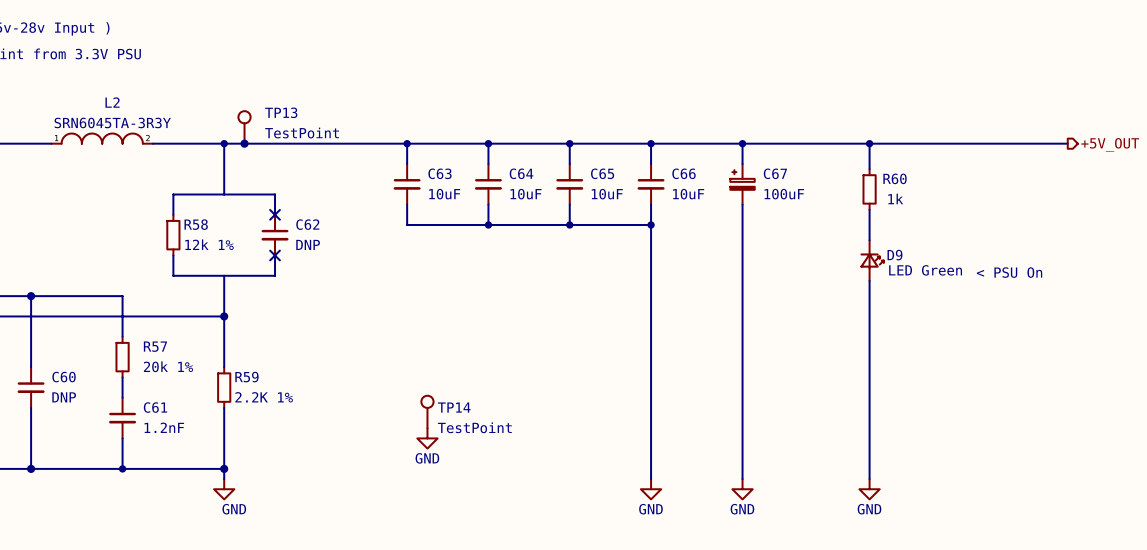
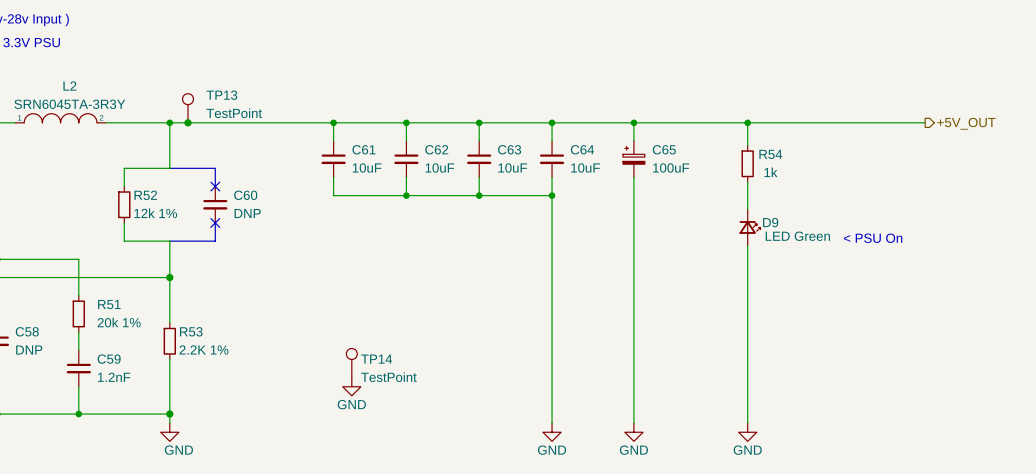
C63 name: C63 (440, 173) -> C61 (363, 149)
C64 name: C64 (521, 173) -> C62 (436, 149)
C65 name: C65 (602, 173) -> C63 (509, 149)
C66 name: C66 (684, 173) -> C64 (582, 149)
C67 name: C67 (775, 173) -> C65 (664, 149)
R60 name: R60 (895, 178) -> R54 (770, 154)
R58 name: R58 (196, 224) -> R52 (145, 195)
C62 name: C62 (307, 224) -> C60 (245, 195)
R57 name: R57 (155, 346) -> R51 (109, 304)
C60 name: C60 (64, 377) -> C58 (27, 331)
R59 name: R59 (246, 377) -> R53 (191, 331)
C61 name: C61 (155, 407) -> C59 (109, 359)

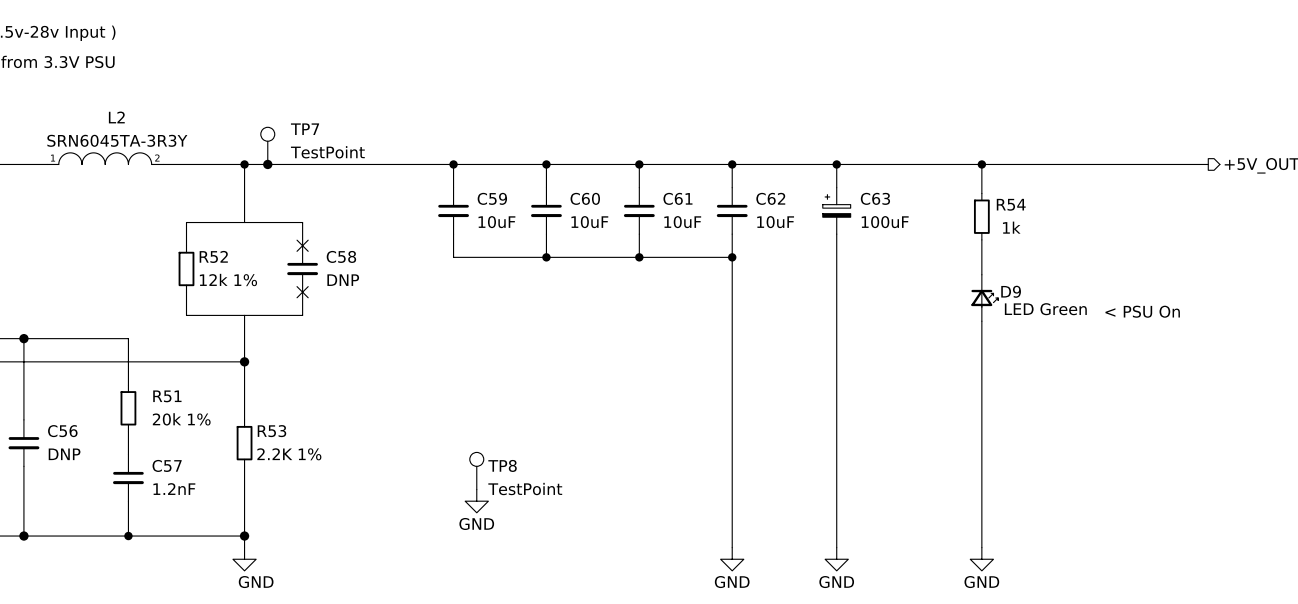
TP13 name: TP13 (221, 95) -> TP7 (305, 129)
C61 name: C61 (363, 149) -> C59 (492, 198)
C62 name: C62 (436, 149) -> C60 (585, 198)
C63 name: C63 (509, 149) -> C61 (677, 198)
C64 name: C64 (582, 149) -> C62 (770, 198)
C65 name: C65 (664, 149) -> C63 (875, 198)
C60 name: C60 (245, 195) -> C58 (341, 256)
C58 name: C58 (27, 331) -> C56 (62, 431)
C59 name: C59 (109, 359) -> C57 (167, 465)
TP14 name: TP14 (376, 359) -> TP8 (502, 465)

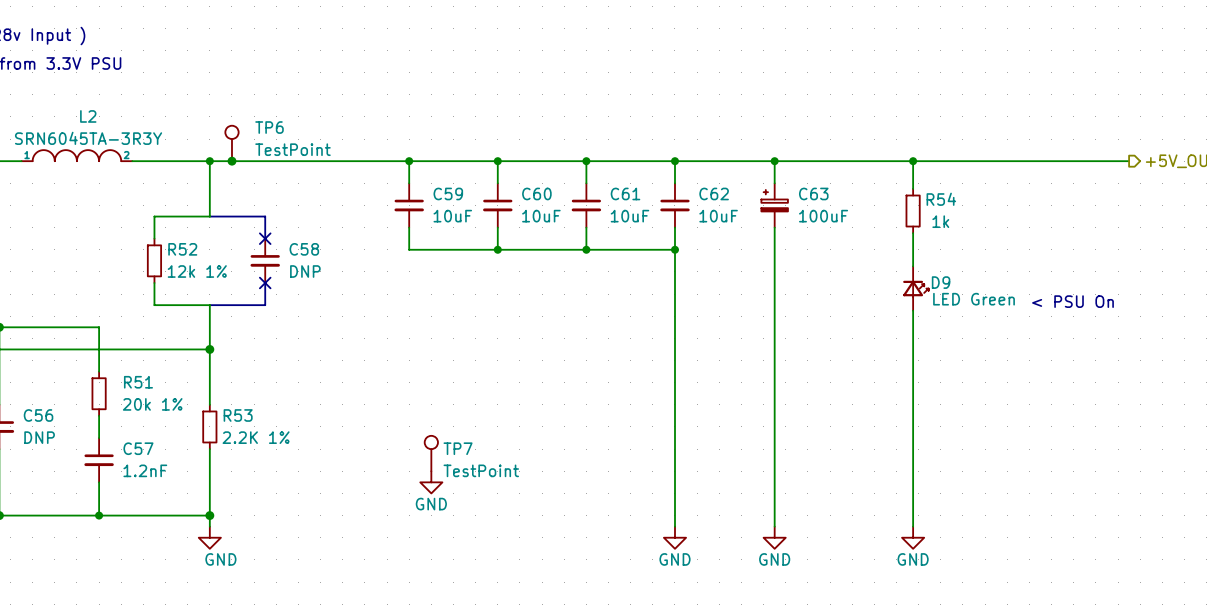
TP7 name: TP7 (305, 129) -> TP6 (269, 127)
TP8 name: TP8 (502, 465) -> TP7 (458, 448)

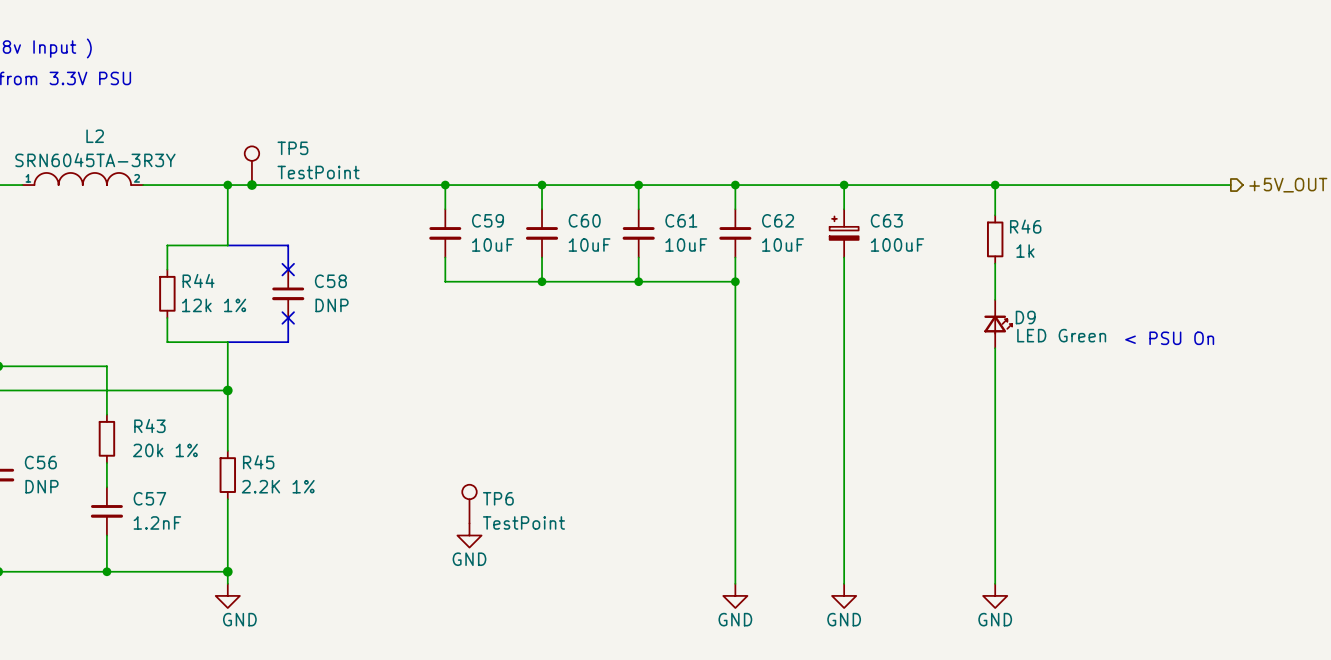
TP6 name: TP6 (269, 127) -> TP5 (292, 148)
R54 name: R54 (941, 199) -> R46 (1025, 226)
R52 name: R52 (182, 249) -> R44 (198, 280)
R51 name: R51 (138, 382) -> R43 (149, 426)
R53 name: R53 (238, 415) -> R45 (258, 462)
TP7 name: TP7 (458, 448) -> TP6 (498, 498)

